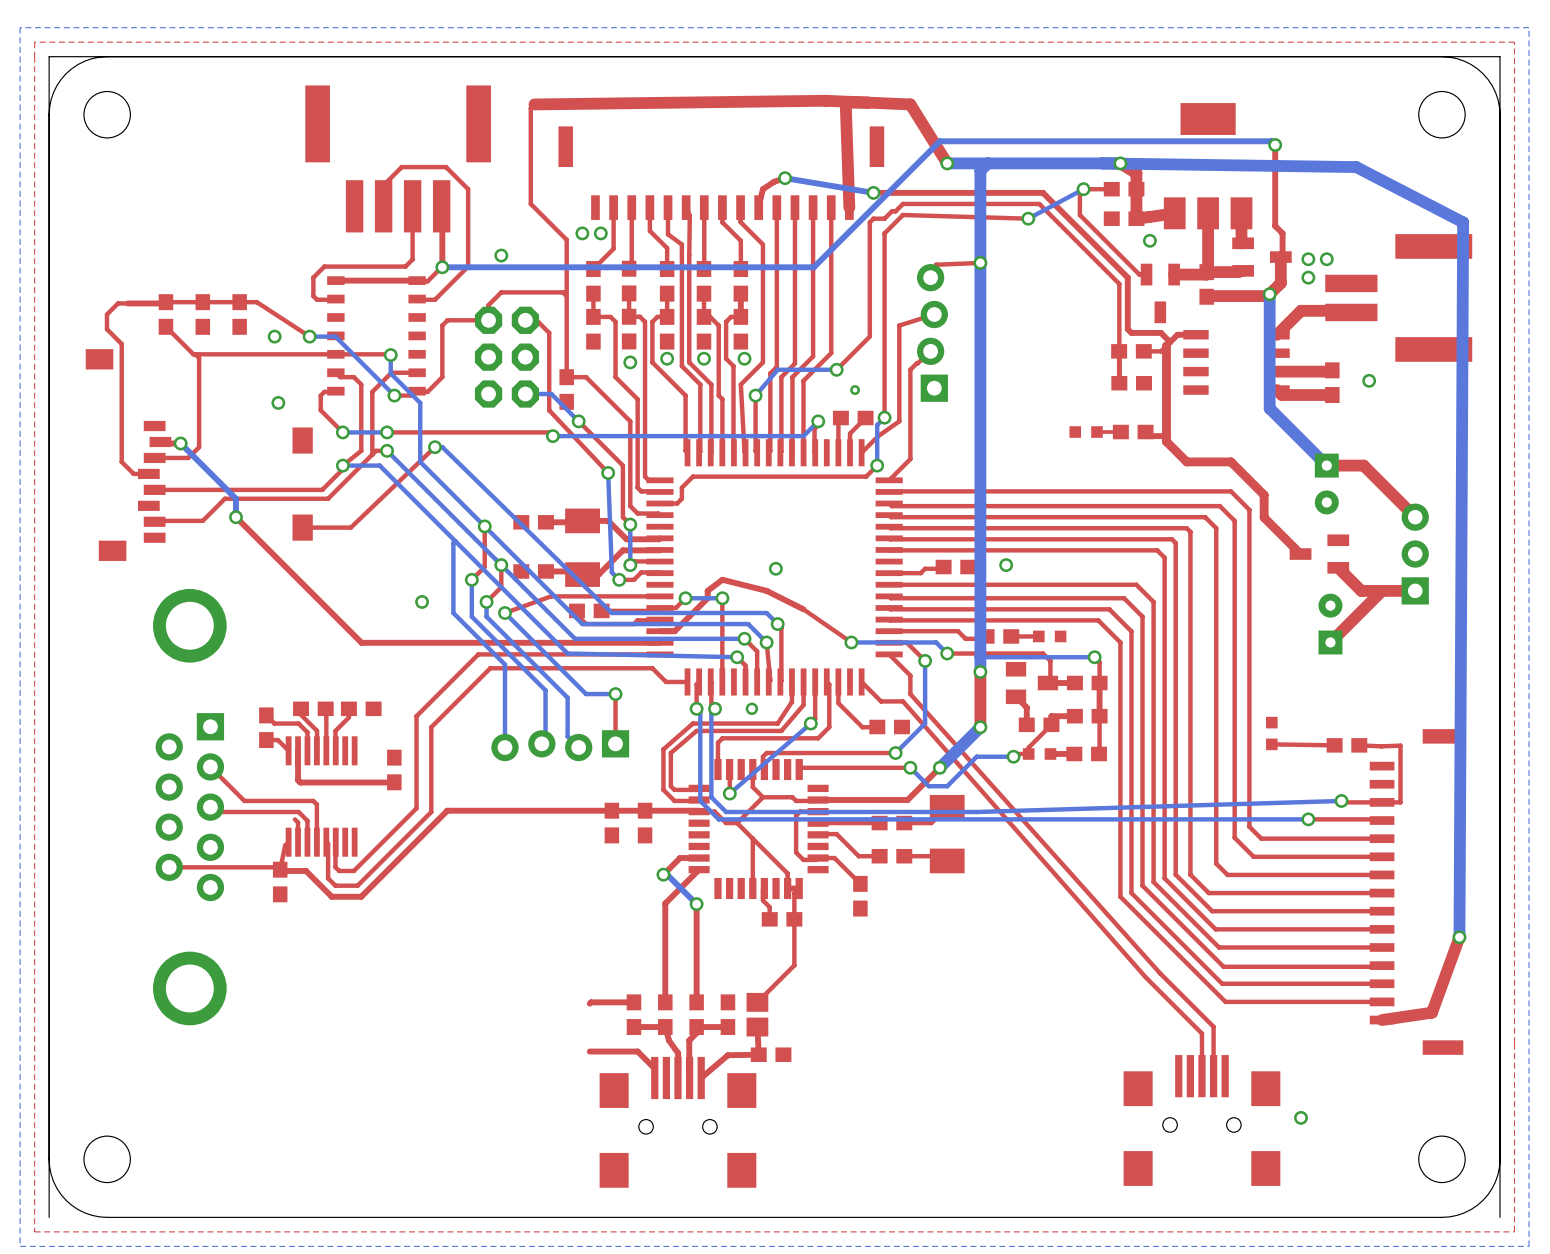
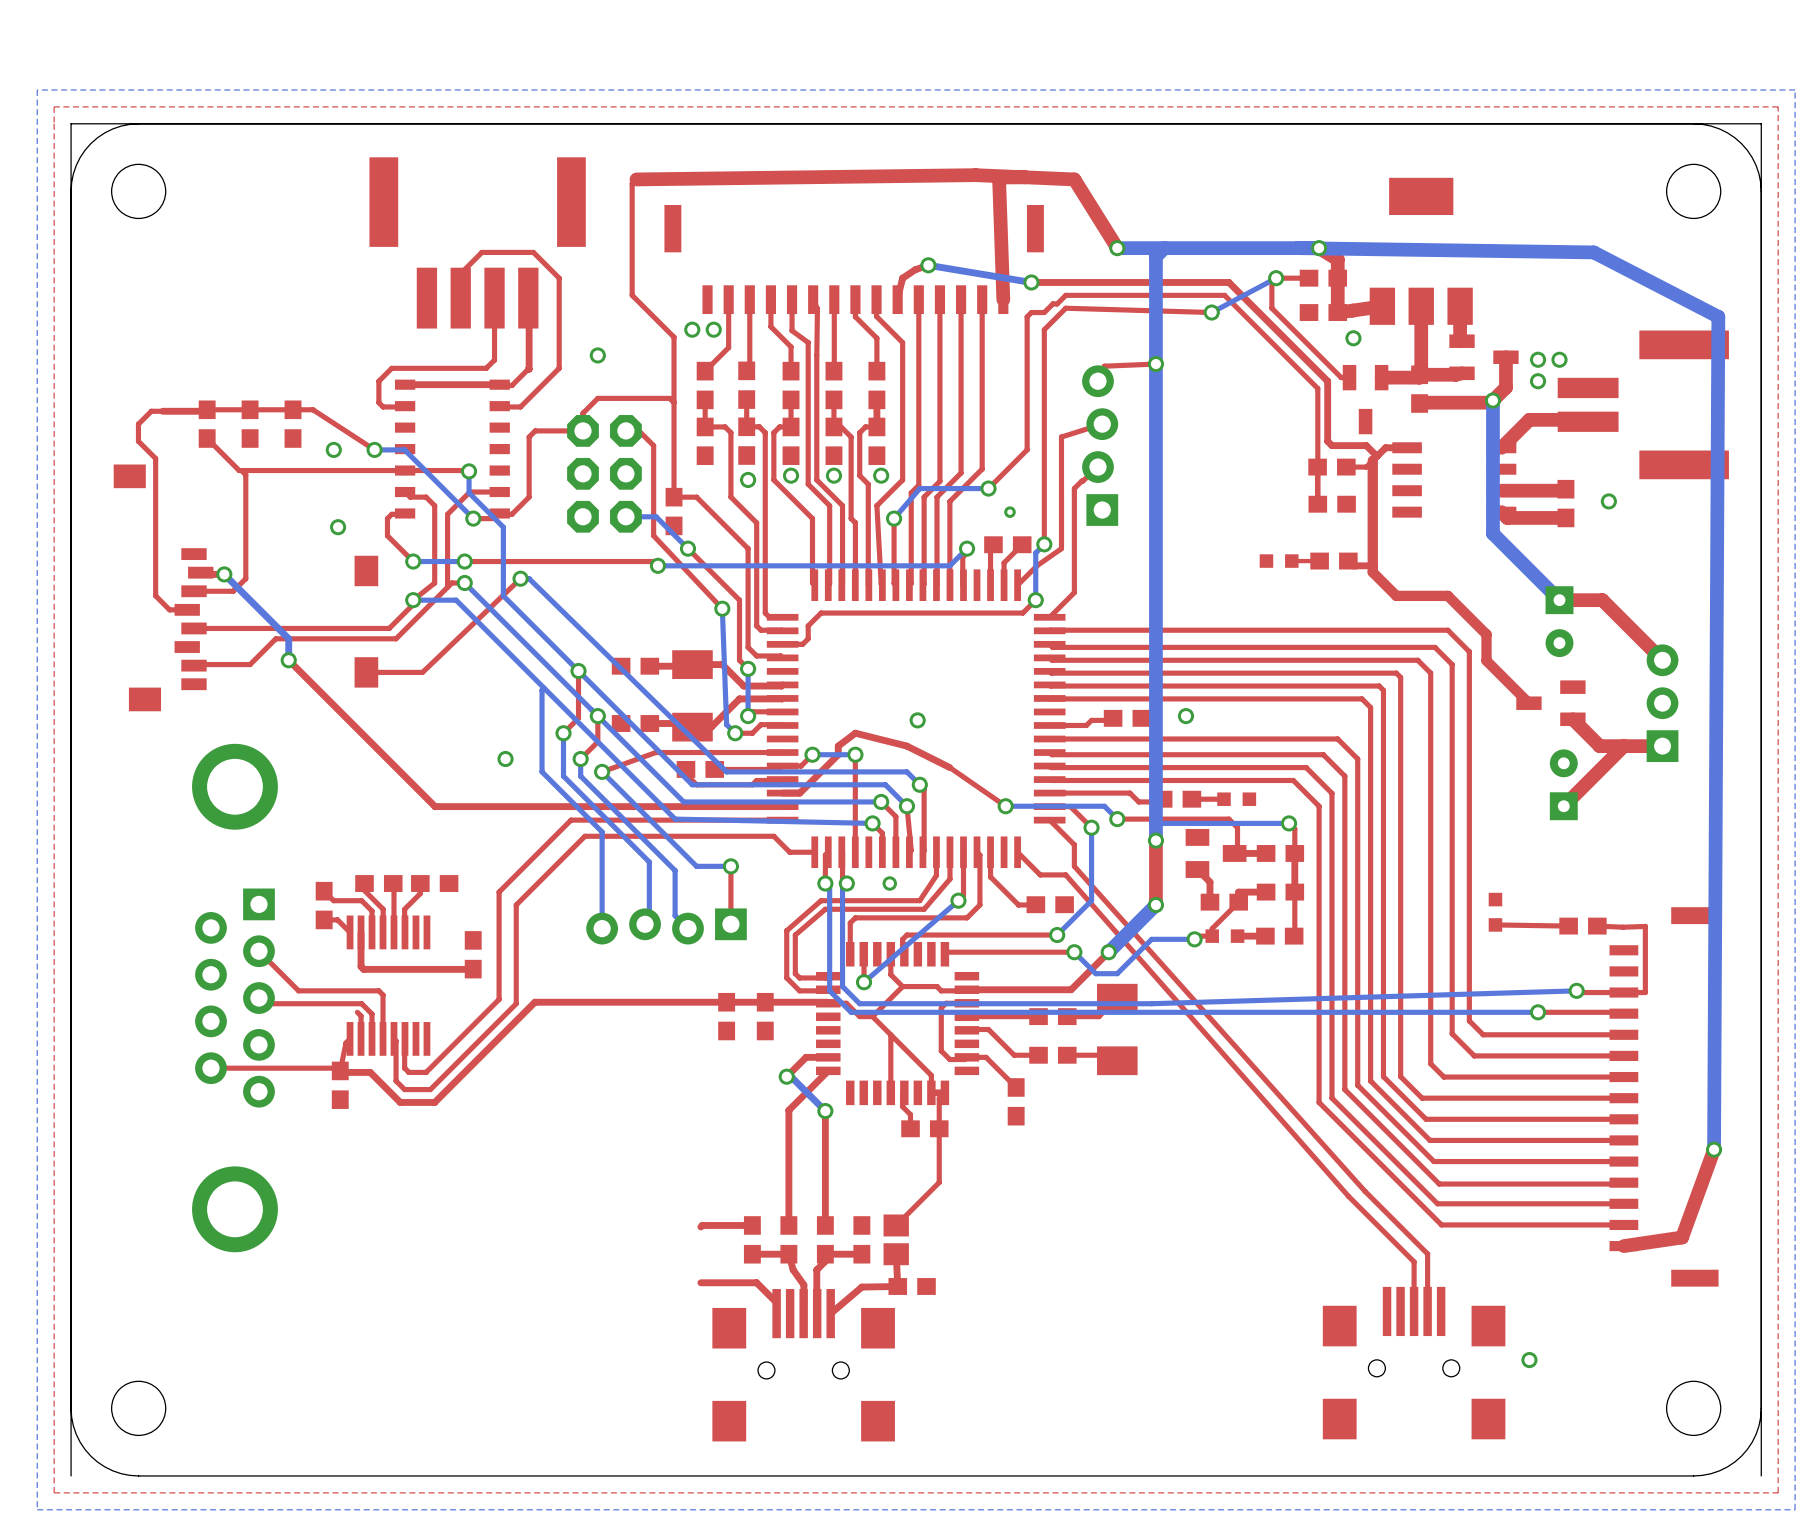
top track: (1275, 144) (1275, 226) (1282, 233) (1282, 255) (1280, 257) -> none
bottom track: (1275, 144) (1271, 141) (939, 141) (813, 267) (442, 267) -> none
via: (1275, 144) -> none
via: (442, 267) -> none

